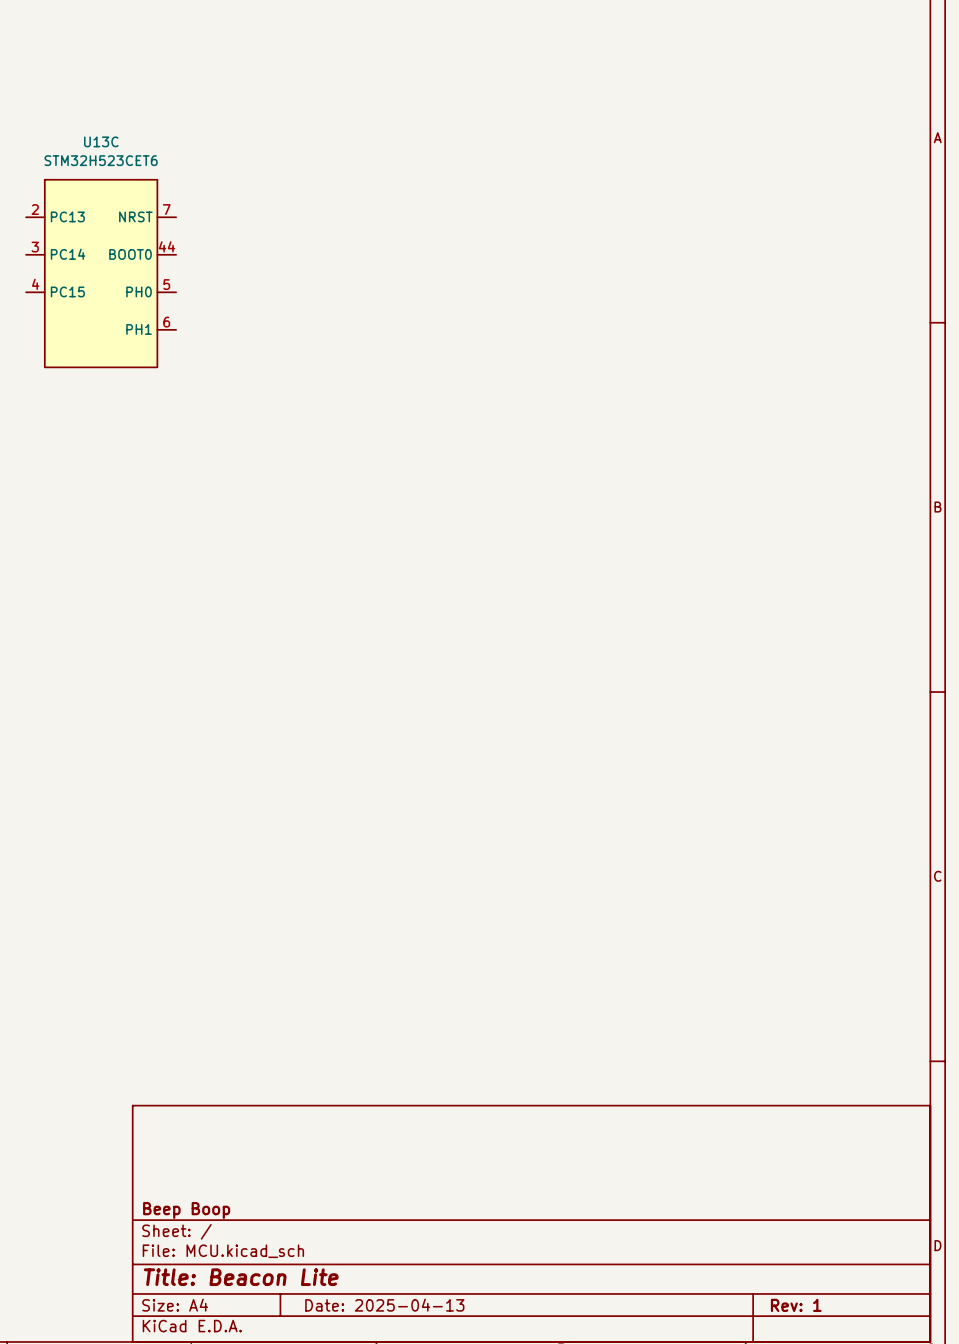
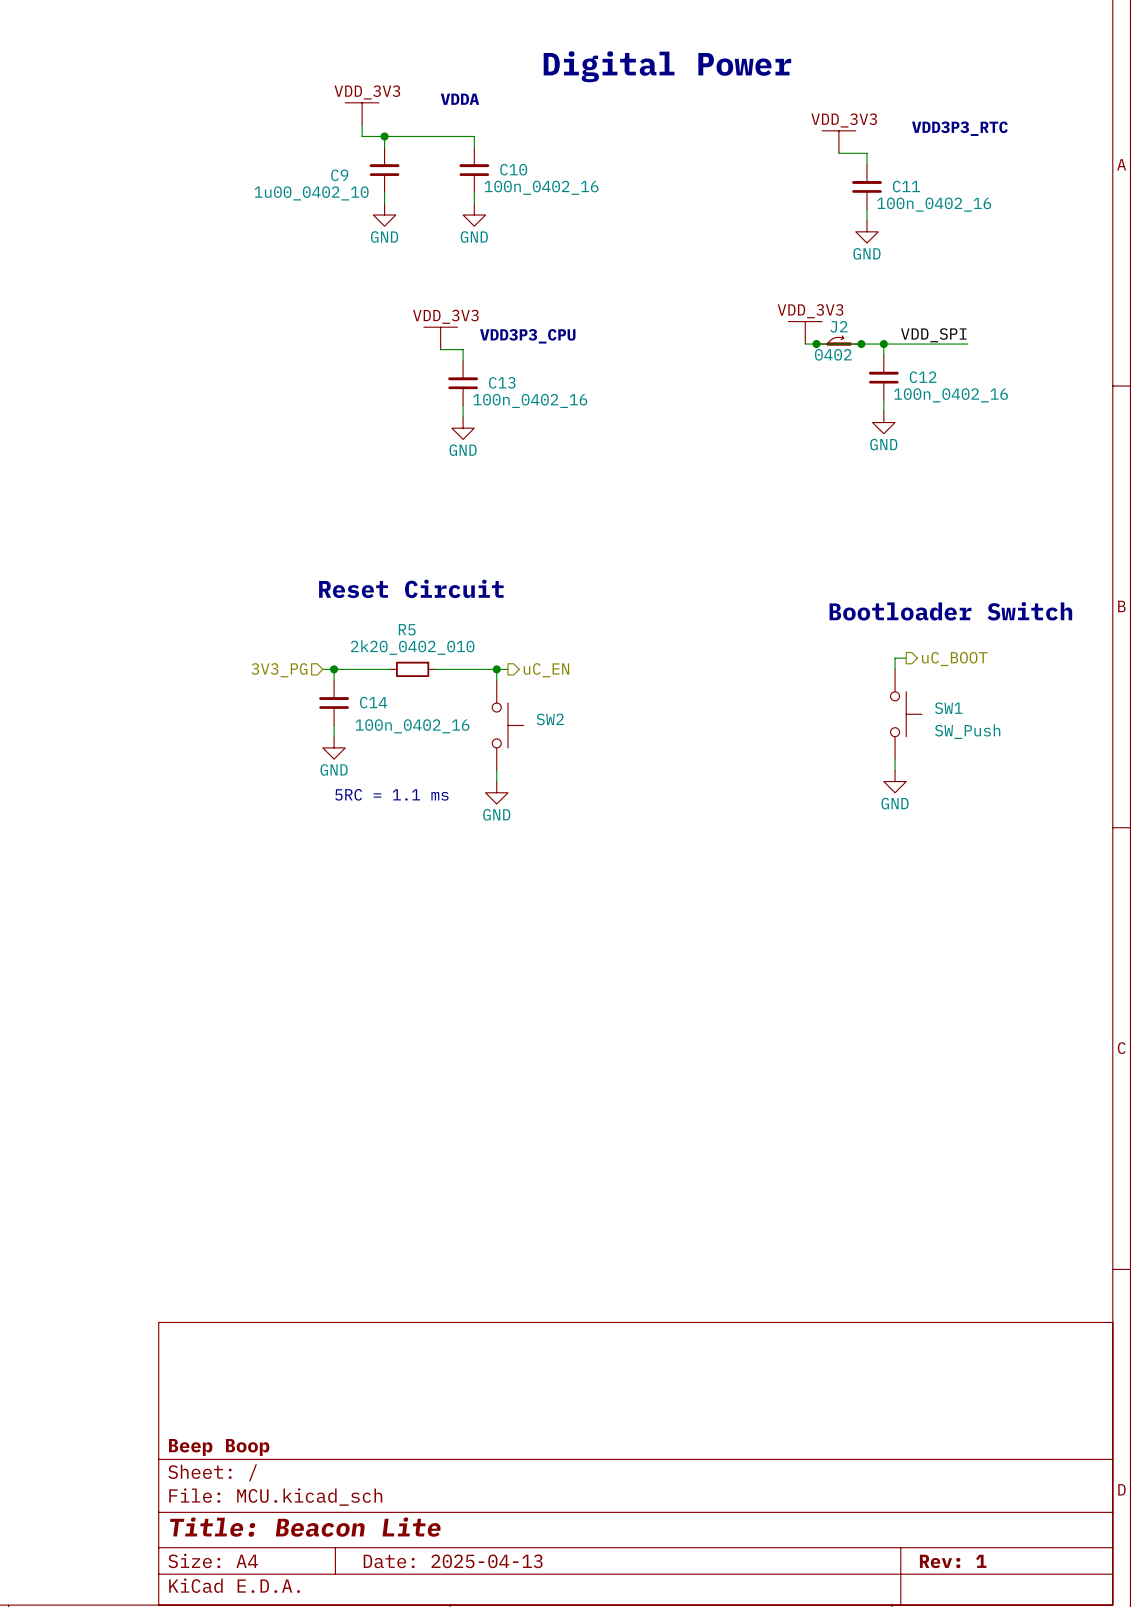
text: none -> Digital Power (667, 66)
text: none -> VDDA (459, 99)
power symbol: none -> (362, 114)
wire: none -> (362, 125) (362, 136) (474, 136) (474, 147)
text: none -> VDD3P3_RTC (959, 128)
wire: none -> (384, 136) (384, 147)
junction: none -> (384, 136)
power symbol: none -> (838, 142)
wire: none -> (838, 153) (866, 153) (866, 164)
C9: none -> 1u00_0402_10 (384, 170)
C10: none -> 100n_0402_16 (474, 170)
C11: none -> 100n_0402_16 (866, 186)
wire: none -> (384, 192) (384, 203)
wire: none -> (474, 192) (474, 203)
wire: none -> (866, 209) (866, 220)
power symbol: none -> GND (384, 215)
power symbol: none -> GND (474, 215)
power symbol: none -> GND (866, 231)
U13C: STM32H523CET6 (101, 273) -> none
power symbol: none -> (805, 332)
label: none -> VDD_SPI (933, 335)
text: none -> VDD3P3_CPU (527, 336)
power symbol: none -> (440, 338)
J2: none -> 0402 (838, 340)
wire: none -> (805, 344) (967, 344)
junction: none -> (816, 344)
junction: none -> (861, 344)
wire: none -> (883, 344) (883, 355)
junction: none -> (883, 344)
wire: none -> (440, 349) (463, 349) (463, 360)
C12: none -> 100n_0402_16 (883, 377)
C13: none -> 100n_0402_16 (463, 383)
wire: none -> (883, 400) (883, 411)
wire: none -> (463, 405) (463, 416)
power symbol: none -> GND (883, 422)
power symbol: none -> GND (463, 428)
text: none -> Reset Circuit (411, 588)
text: none -> Bootloader Switch (950, 611)
wire: none -> (906, 658) (895, 658) (895, 669)
hierarchical label: none -> uC_BOOT (954, 659)
hierarchical label: none -> 3V3_PG (279, 670)
wire: none -> (322, 669) (390, 669)
wire: none -> (334, 669) (334, 680)
junction: none -> (334, 669)
R5: none -> 2k20_0402_010 (412, 669)
wire: none -> (435, 669) (507, 669)
wire: none -> (496, 669) (496, 680)
junction: none -> (496, 669)
hierarchical label: none -> uC_EN (546, 670)
C14: none -> 100n_0402_16 (334, 703)
SW1: none -> SW_Push (906, 714)
wire: none -> (334, 725) (334, 736)
SW2: none -> (507, 725)
power symbol: none -> GND (334, 747)
wire: none -> (895, 759) (895, 770)
wire: none -> (496, 770) (496, 781)
power symbol: none -> GND (895, 781)
power symbol: none -> GND (496, 792)
text: none -> 5RC = 1.1 ms (391, 794)

